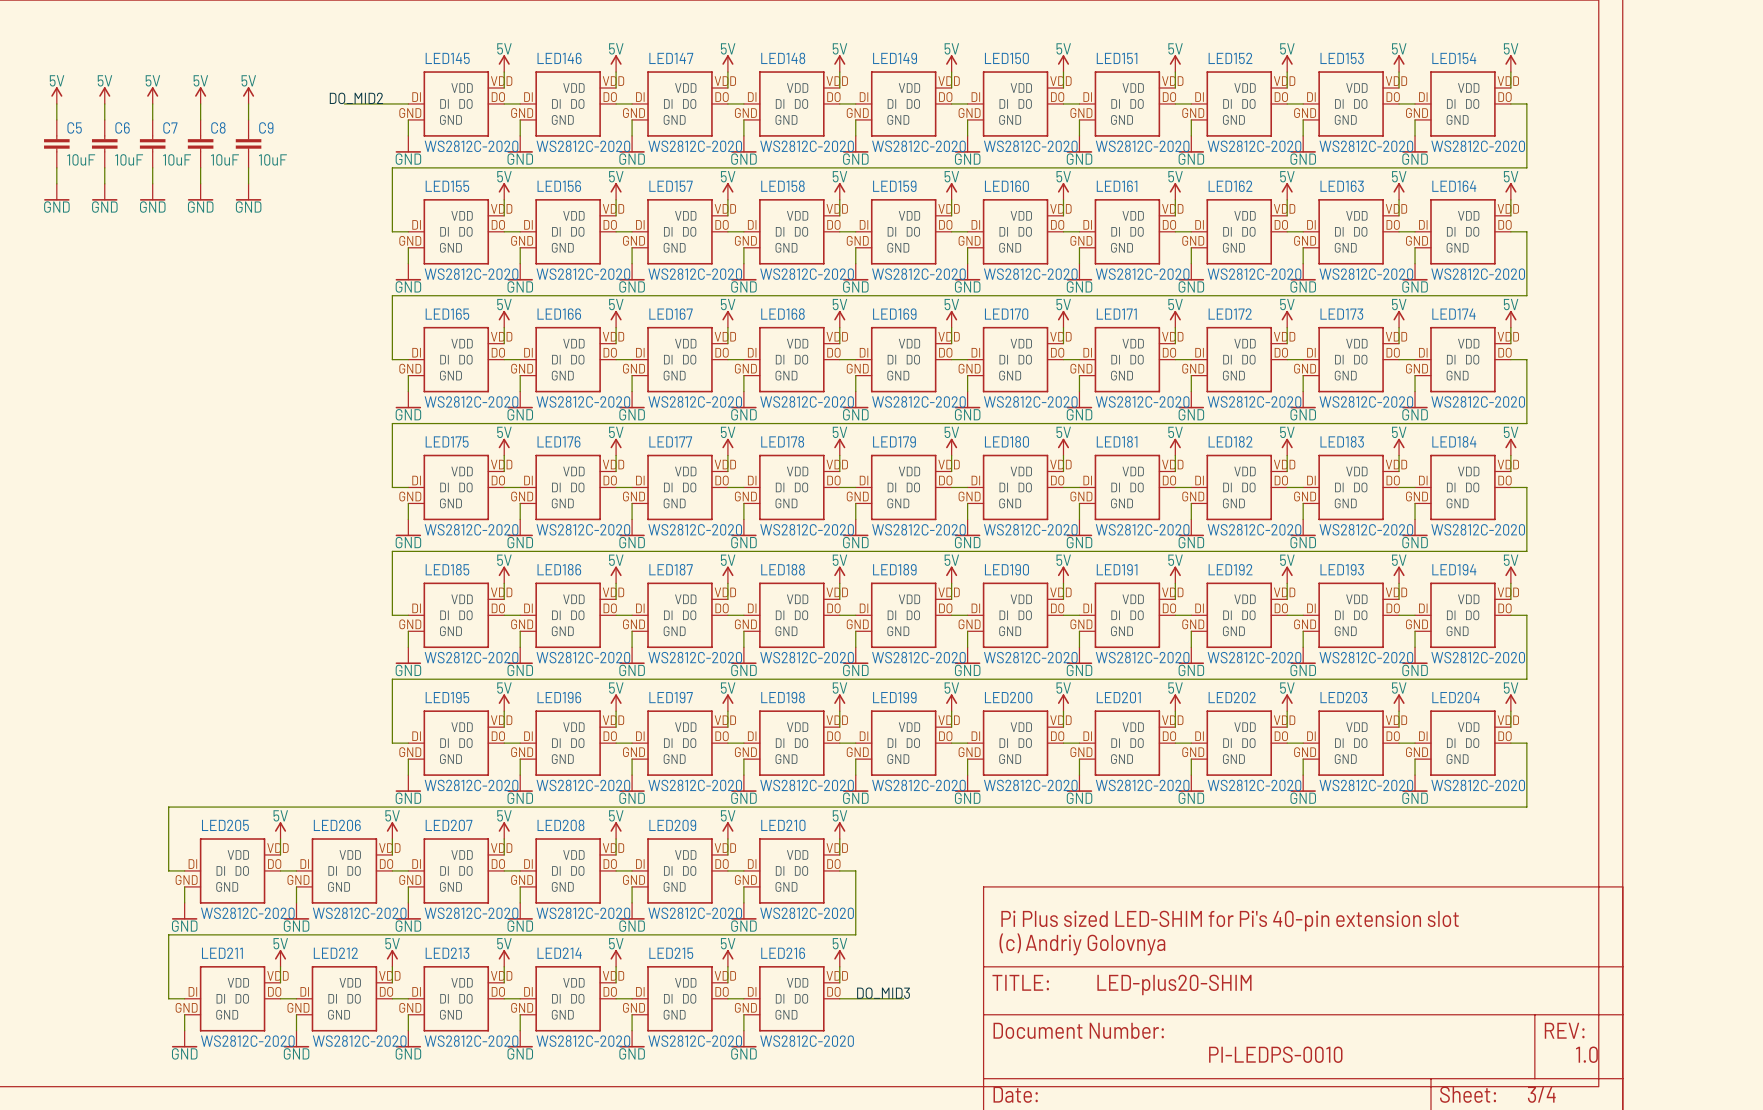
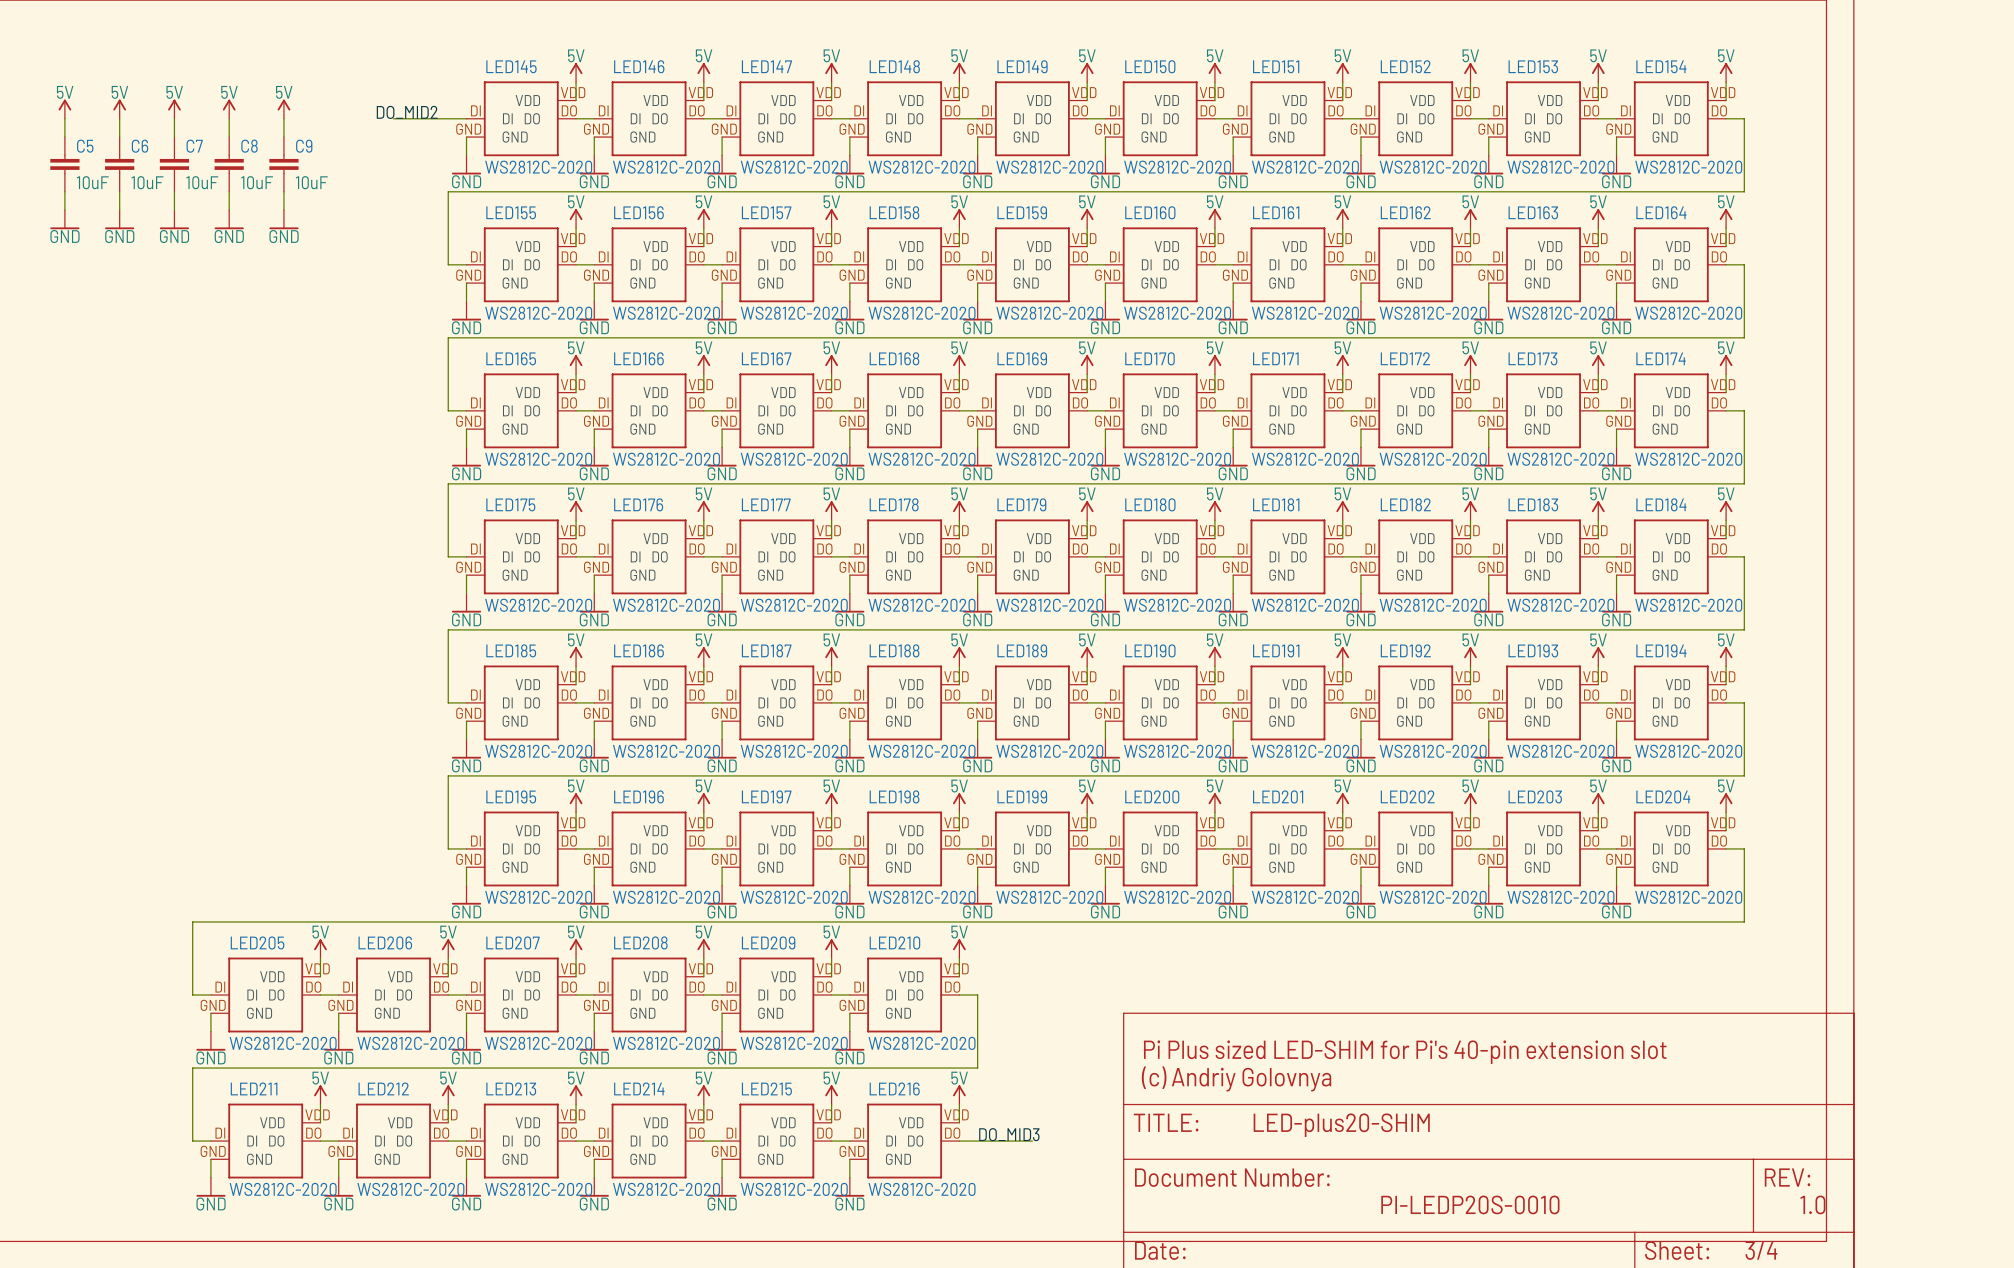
text: PI-LEDPS-0010 (1275, 1054) -> PI-LEDP20S-0010 (1470, 1204)

